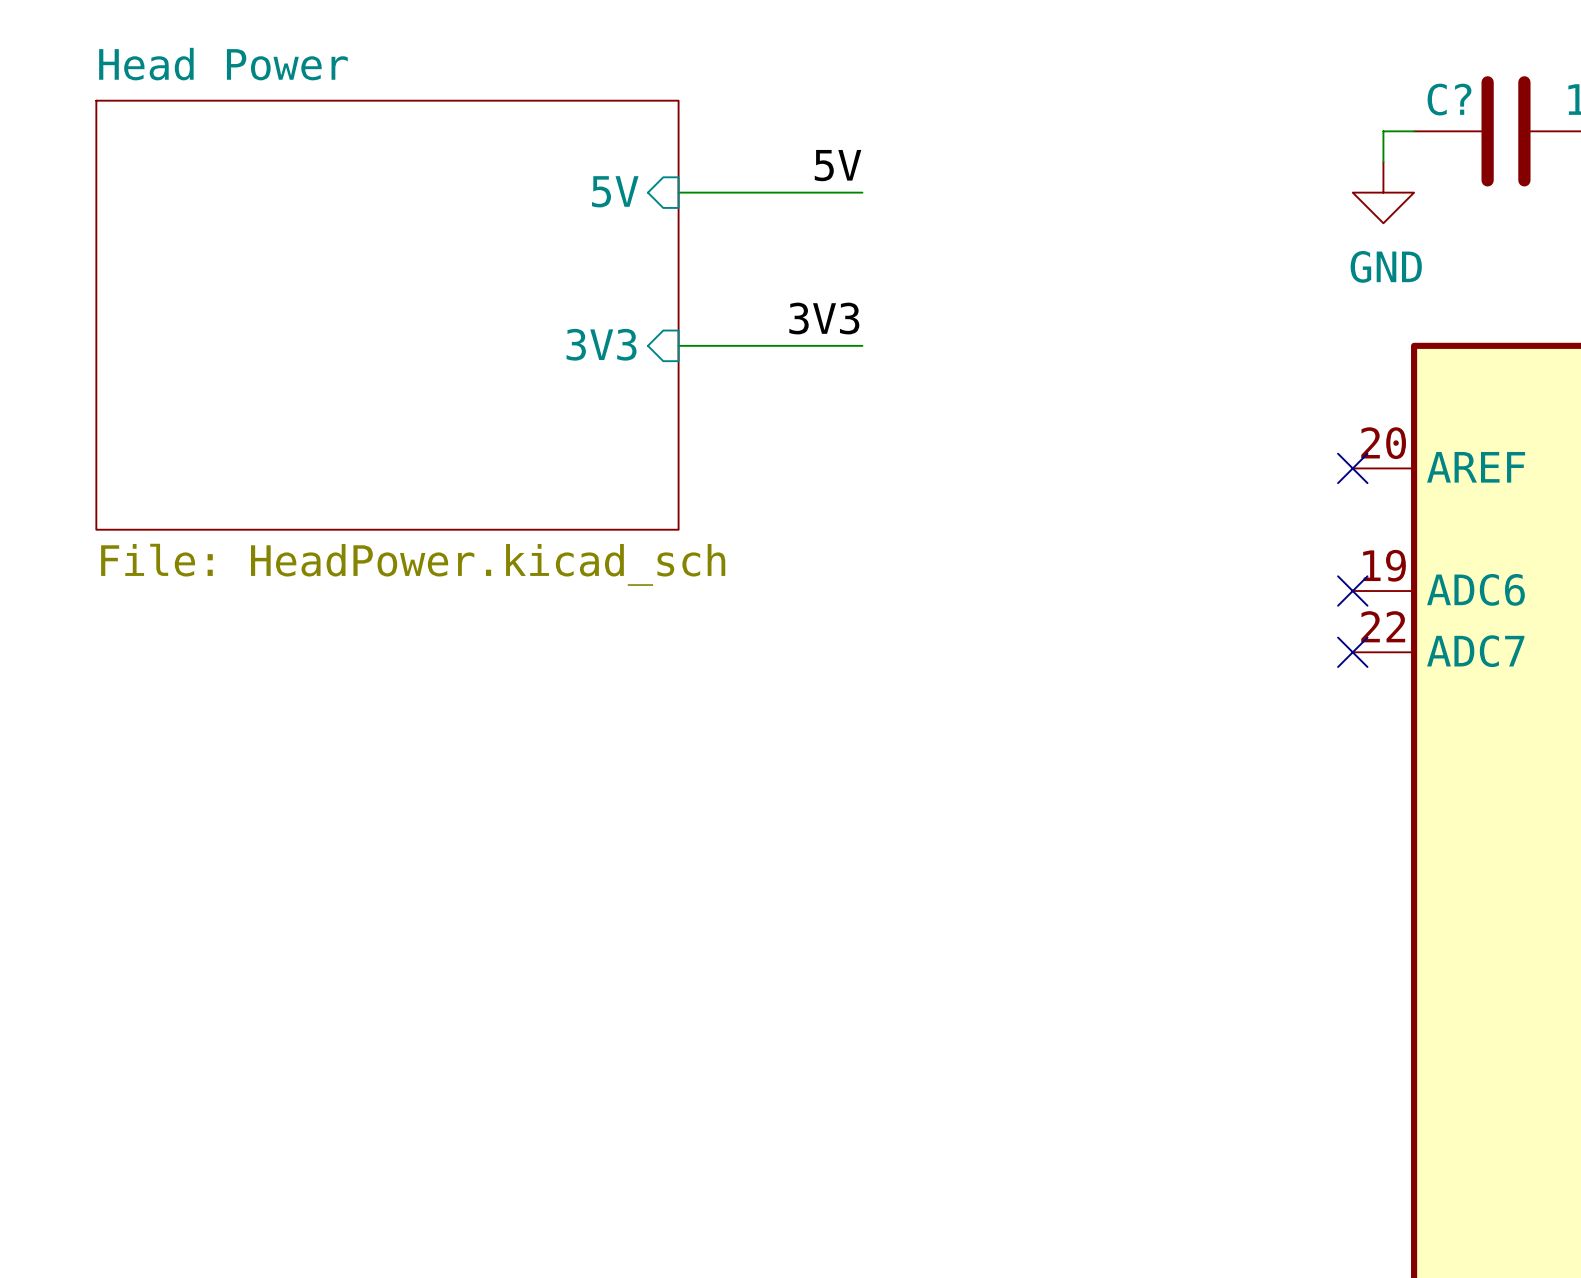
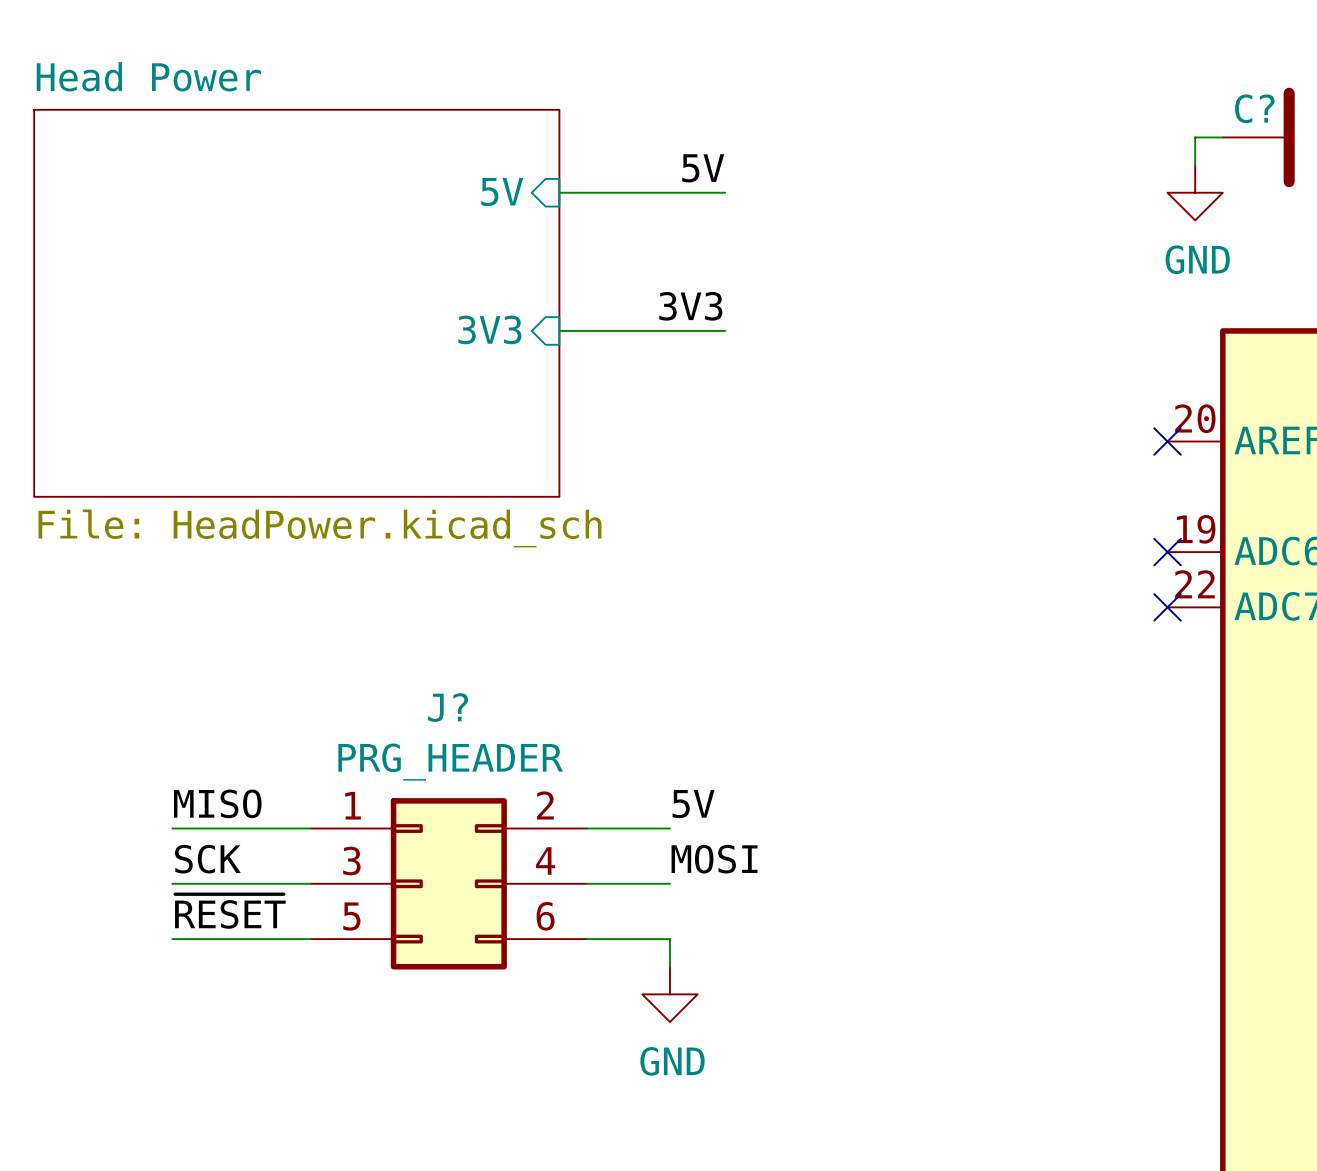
label: none -> MISO (217, 803)
label: none -> 5V (693, 804)
wire: none -> (172, 828) (310, 828)
wire: none -> (587, 828) (669, 828)
label: none -> SCK (207, 859)
label: none -> MOSI (714, 859)
wire: none -> (172, 883) (310, 883)
J?: none -> PRG_HEADER (448, 883)
wire: none -> (587, 883) (669, 883)
label: none -> ~{RESET} (230, 911)
wire: none -> (172, 939) (310, 939)
wire: none -> (587, 939) (669, 939) (669, 966)
power symbol: none -> GND (669, 994)

